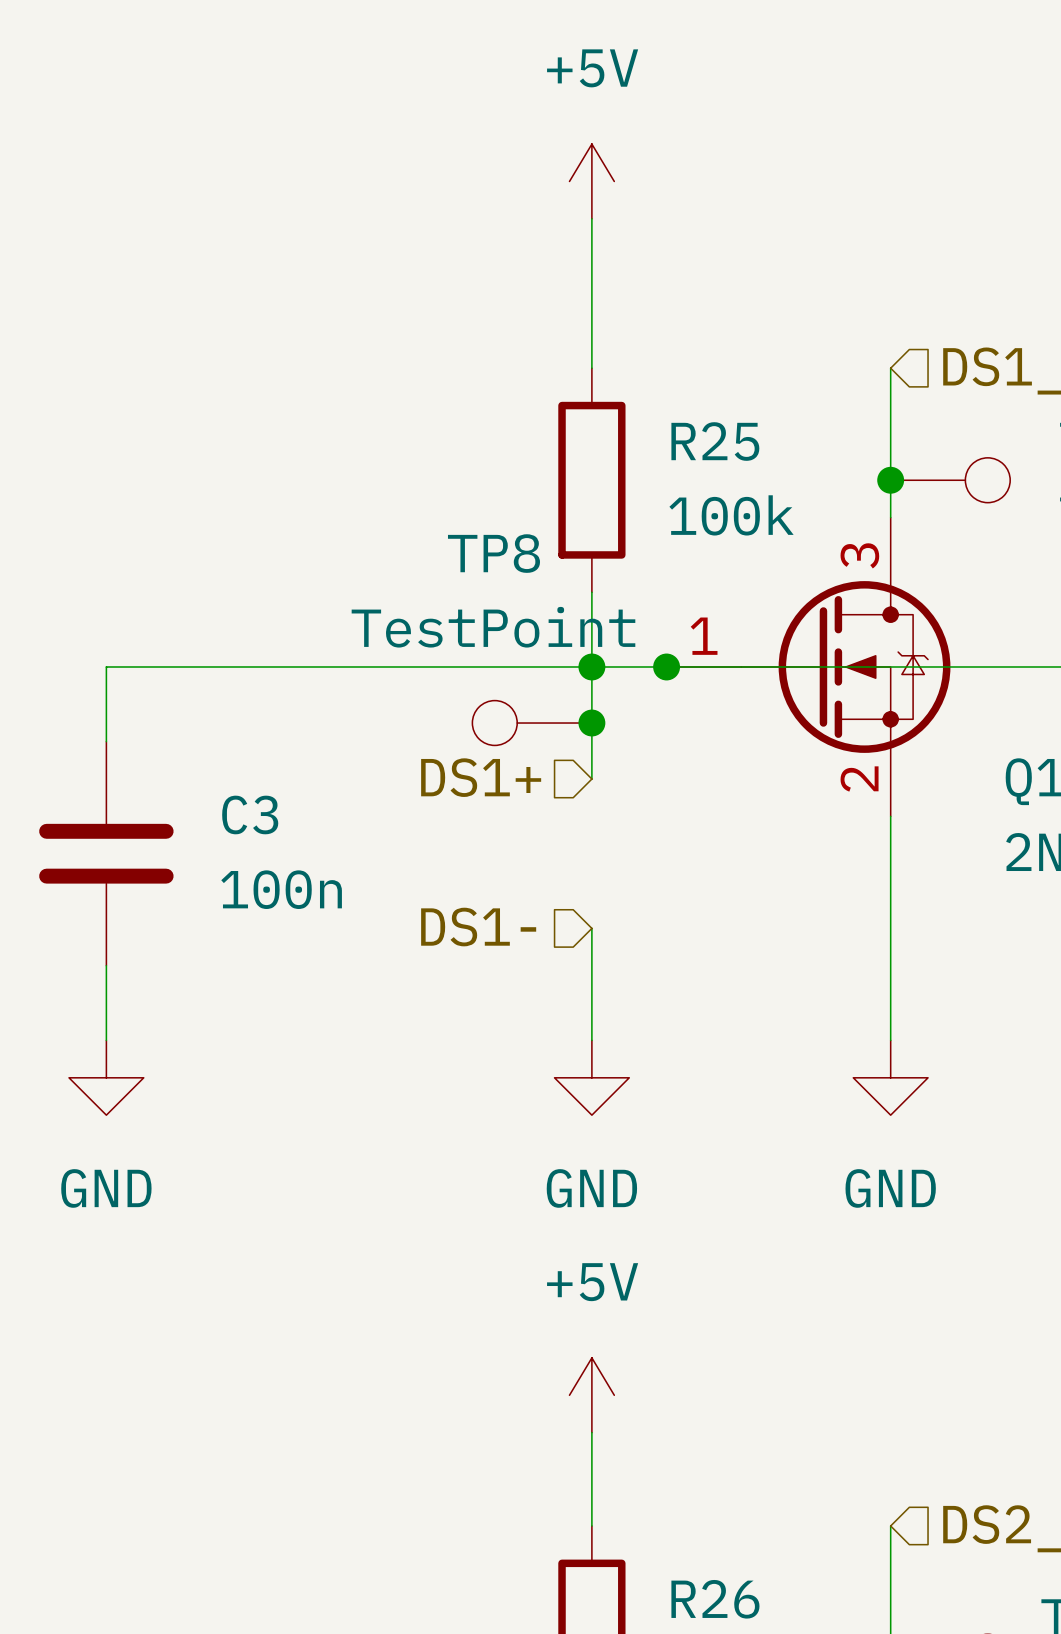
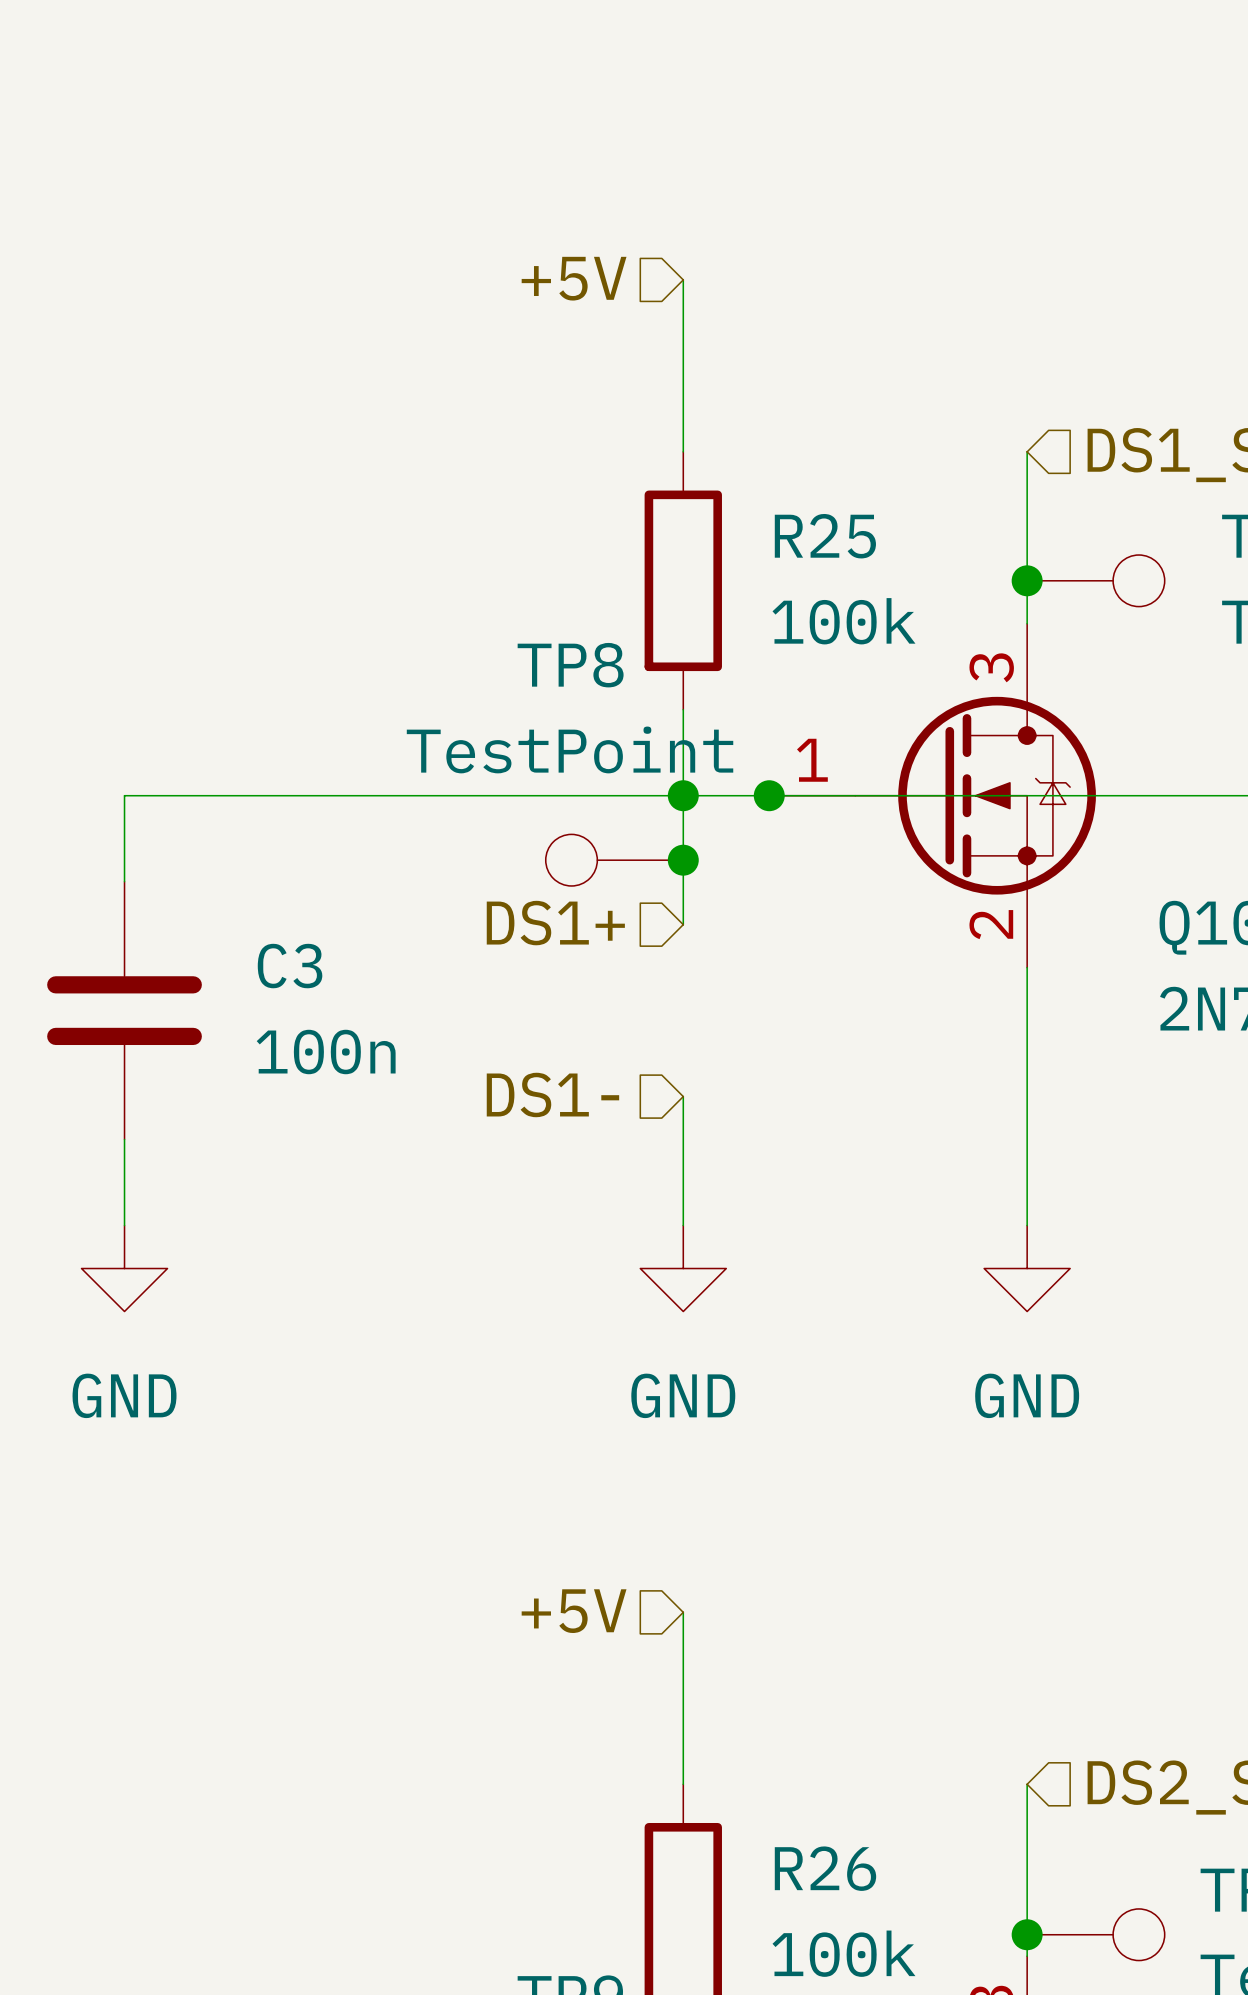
power symbol: +5V (591, 181) -> none
hierarchical label: none -> +5V (574, 278)
hierarchical label: none -> +5V (574, 1611)
power symbol: +5V (591, 1395) -> none

